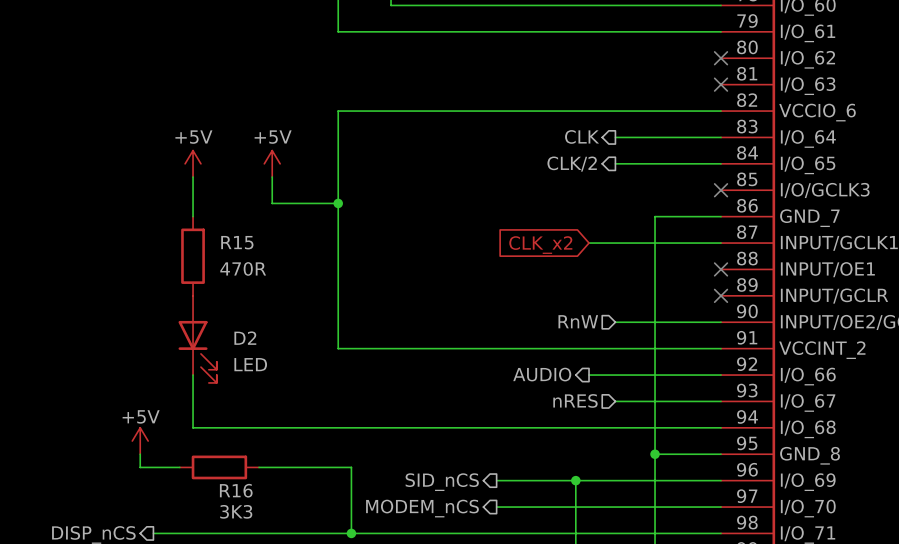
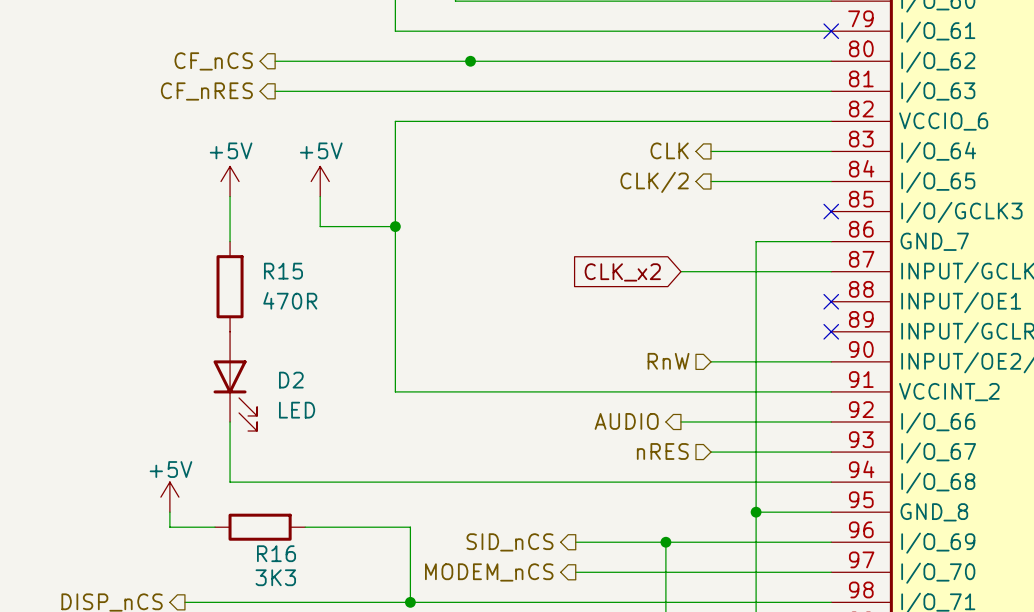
no-connect mark: none -> (831, 31)
wire: none -> (275, 61) (831, 61)
junction: none -> (470, 61)
no-connect mark: (721, 58) -> none
hierarchical label: none -> CF_nCS (213, 61)
wire: none -> (275, 91) (831, 91)
no-connect mark: (721, 84) -> none
hierarchical label: none -> CF_nRES (206, 91)

